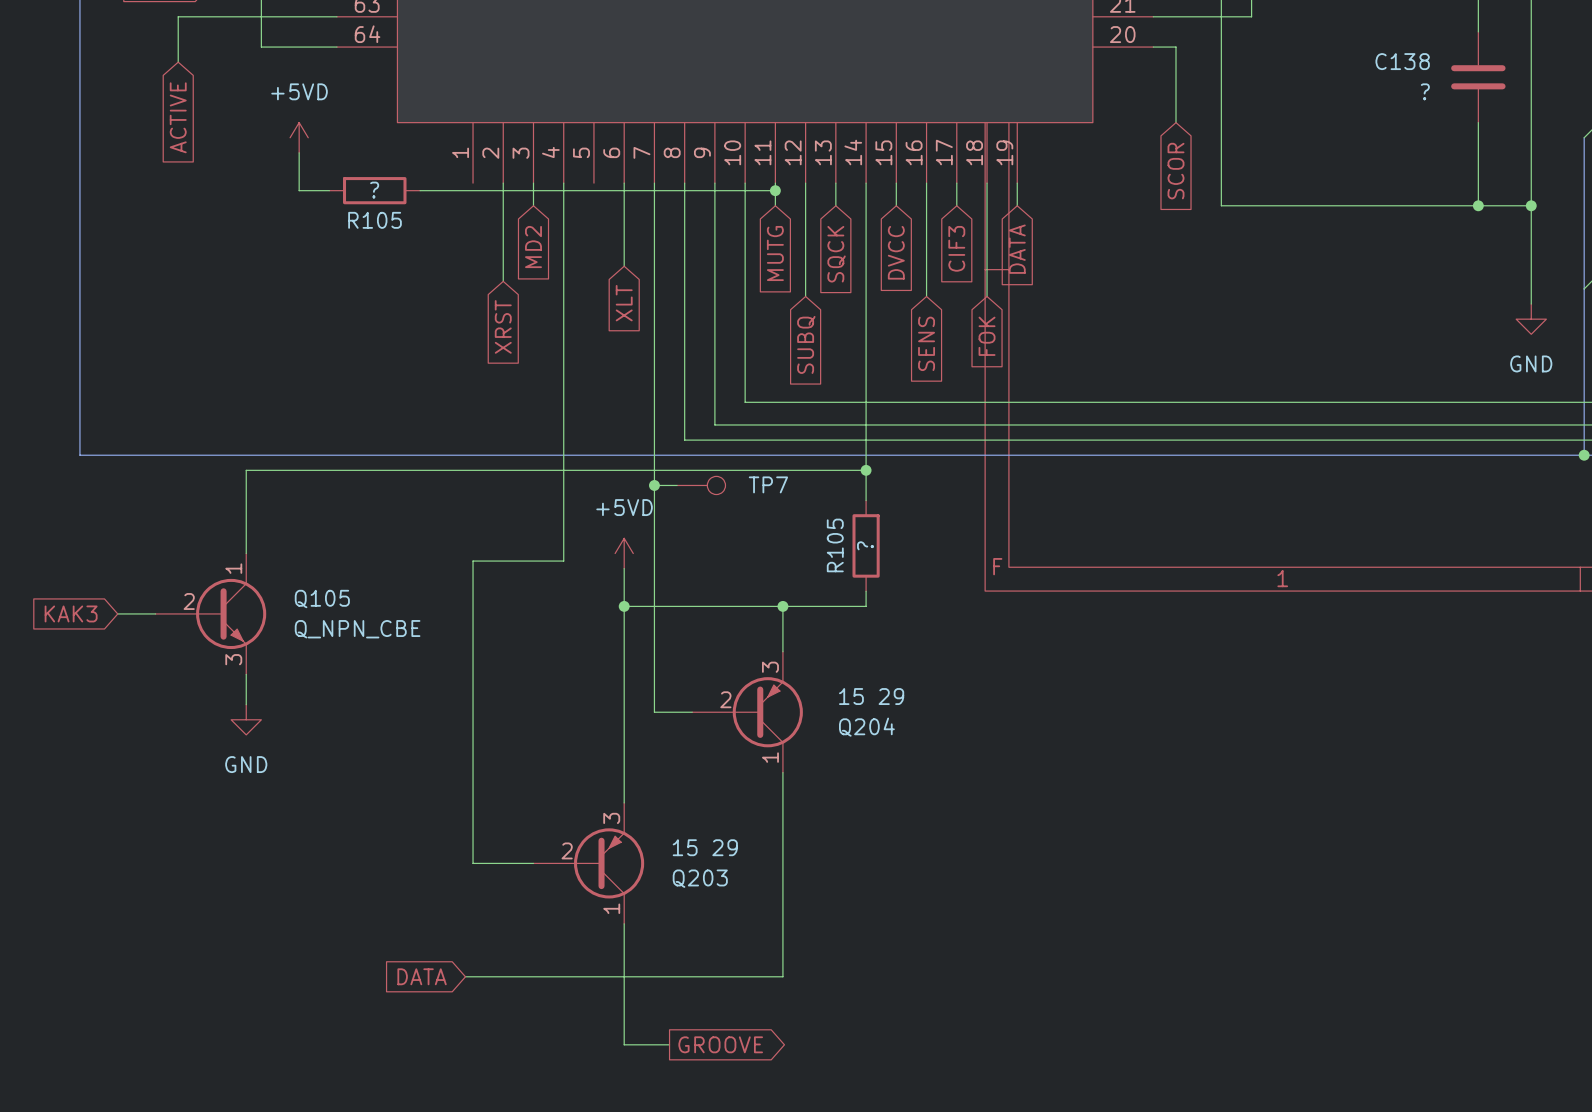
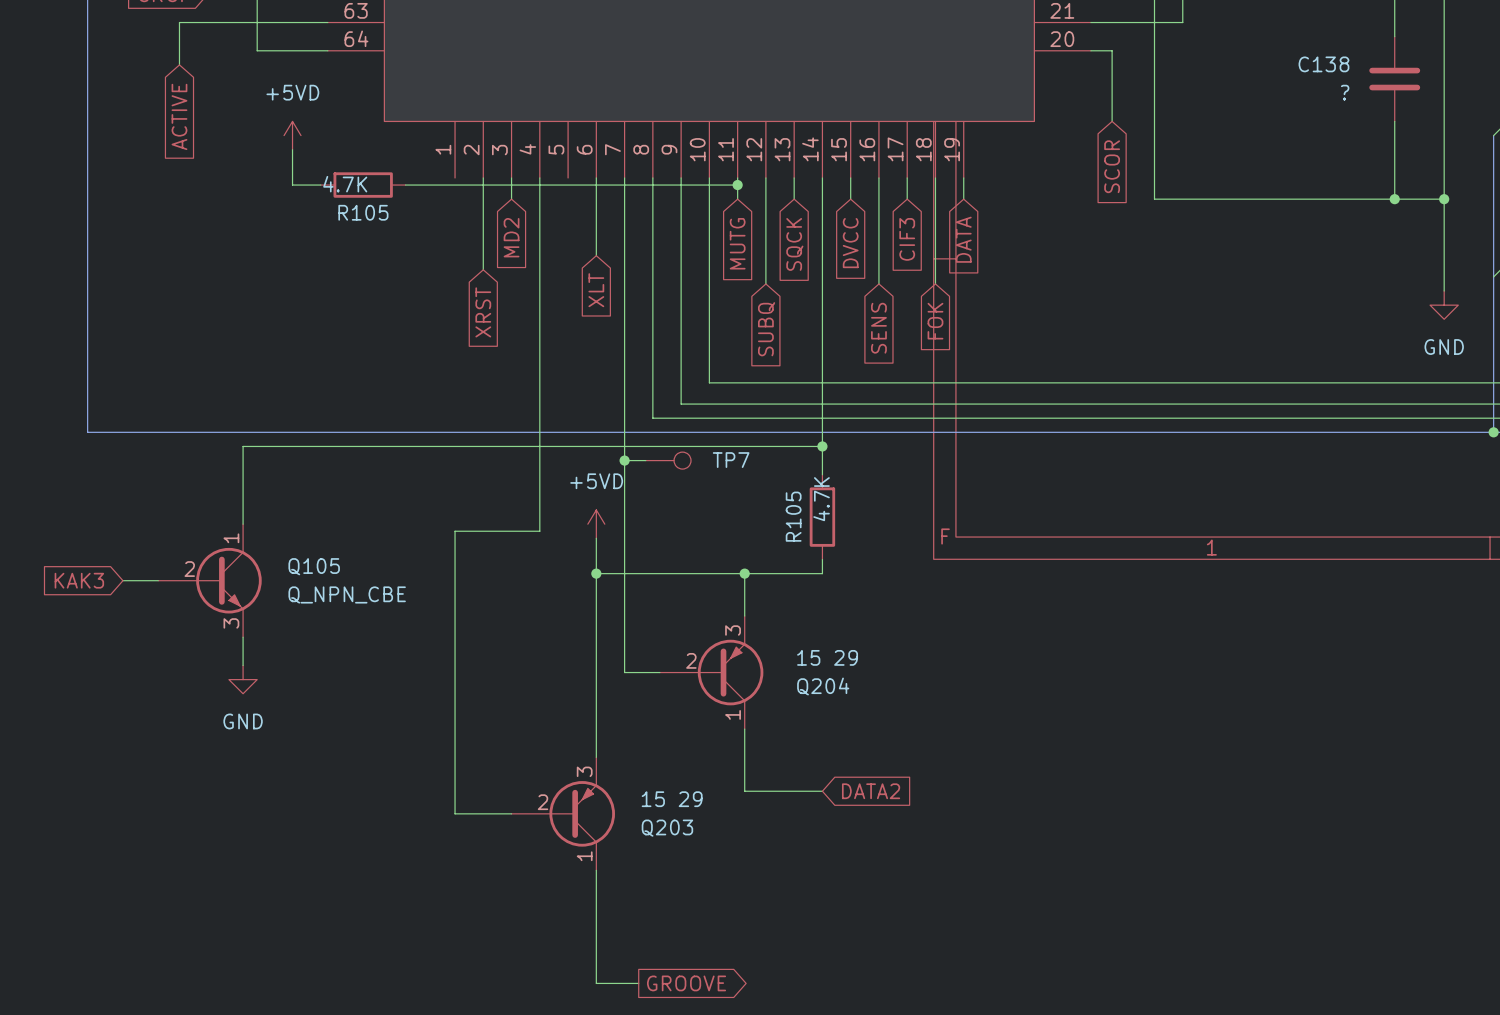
R105 value: ? (374, 190) -> 4.7K (345, 184)
R105 value: ? (865, 545) -> 4.7K (821, 499)
wire: (782, 839) (782, 976) (465, 976) -> (744, 791) (822, 791)
global label: none -> DATA2 (871, 791)
global label: DATA (422, 976) -> none

